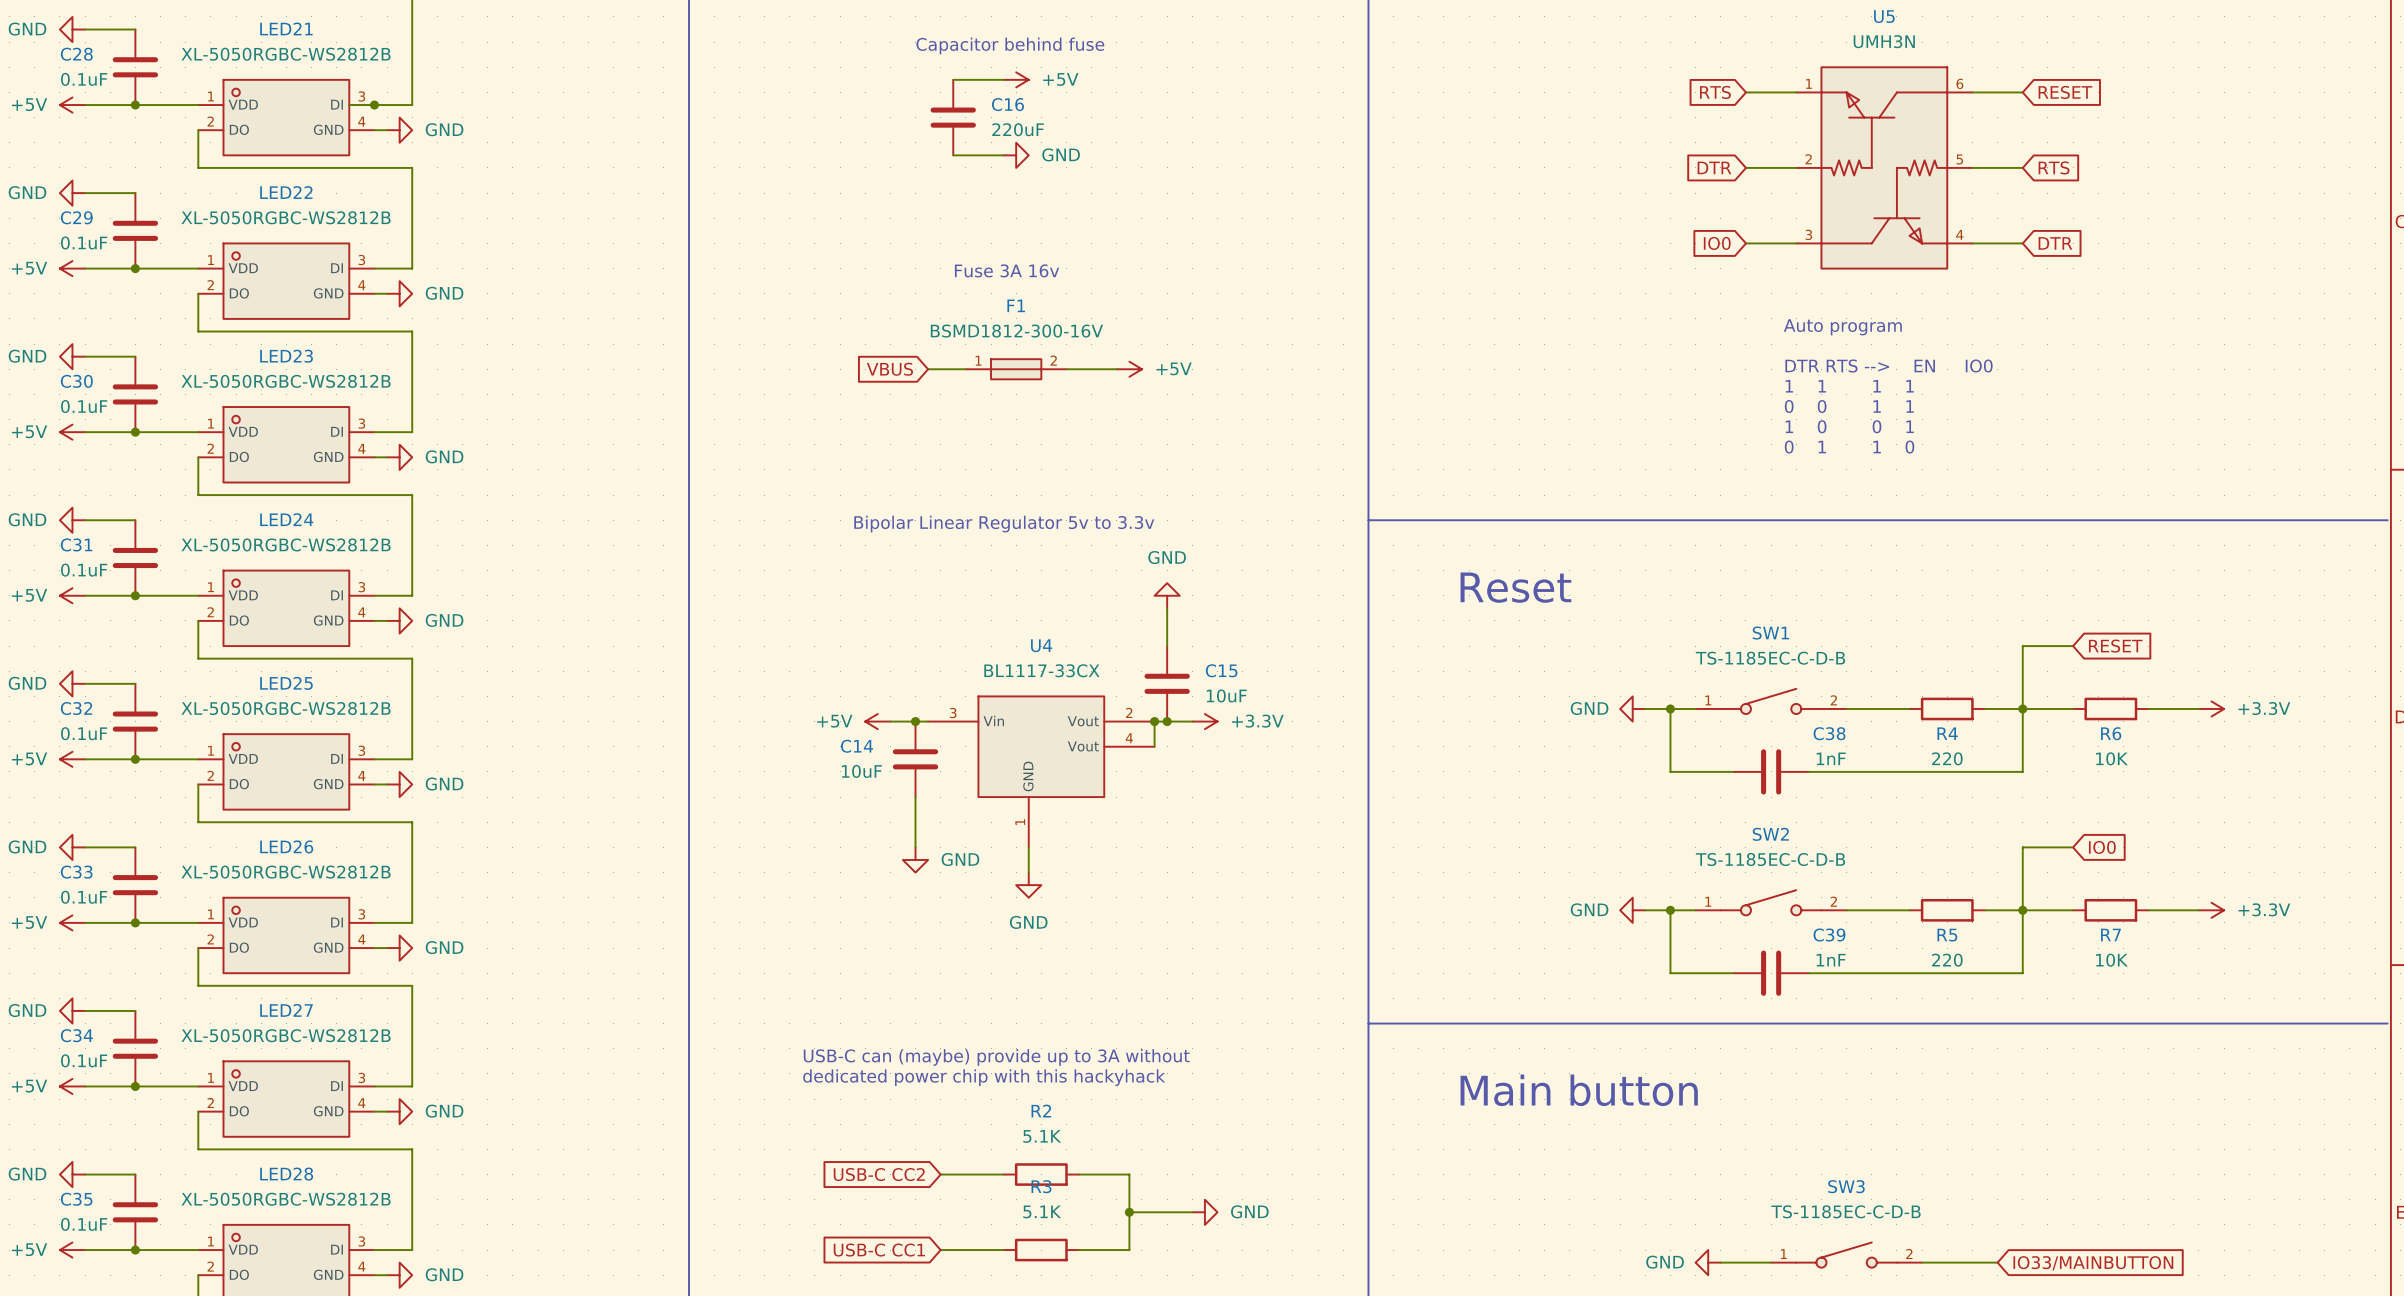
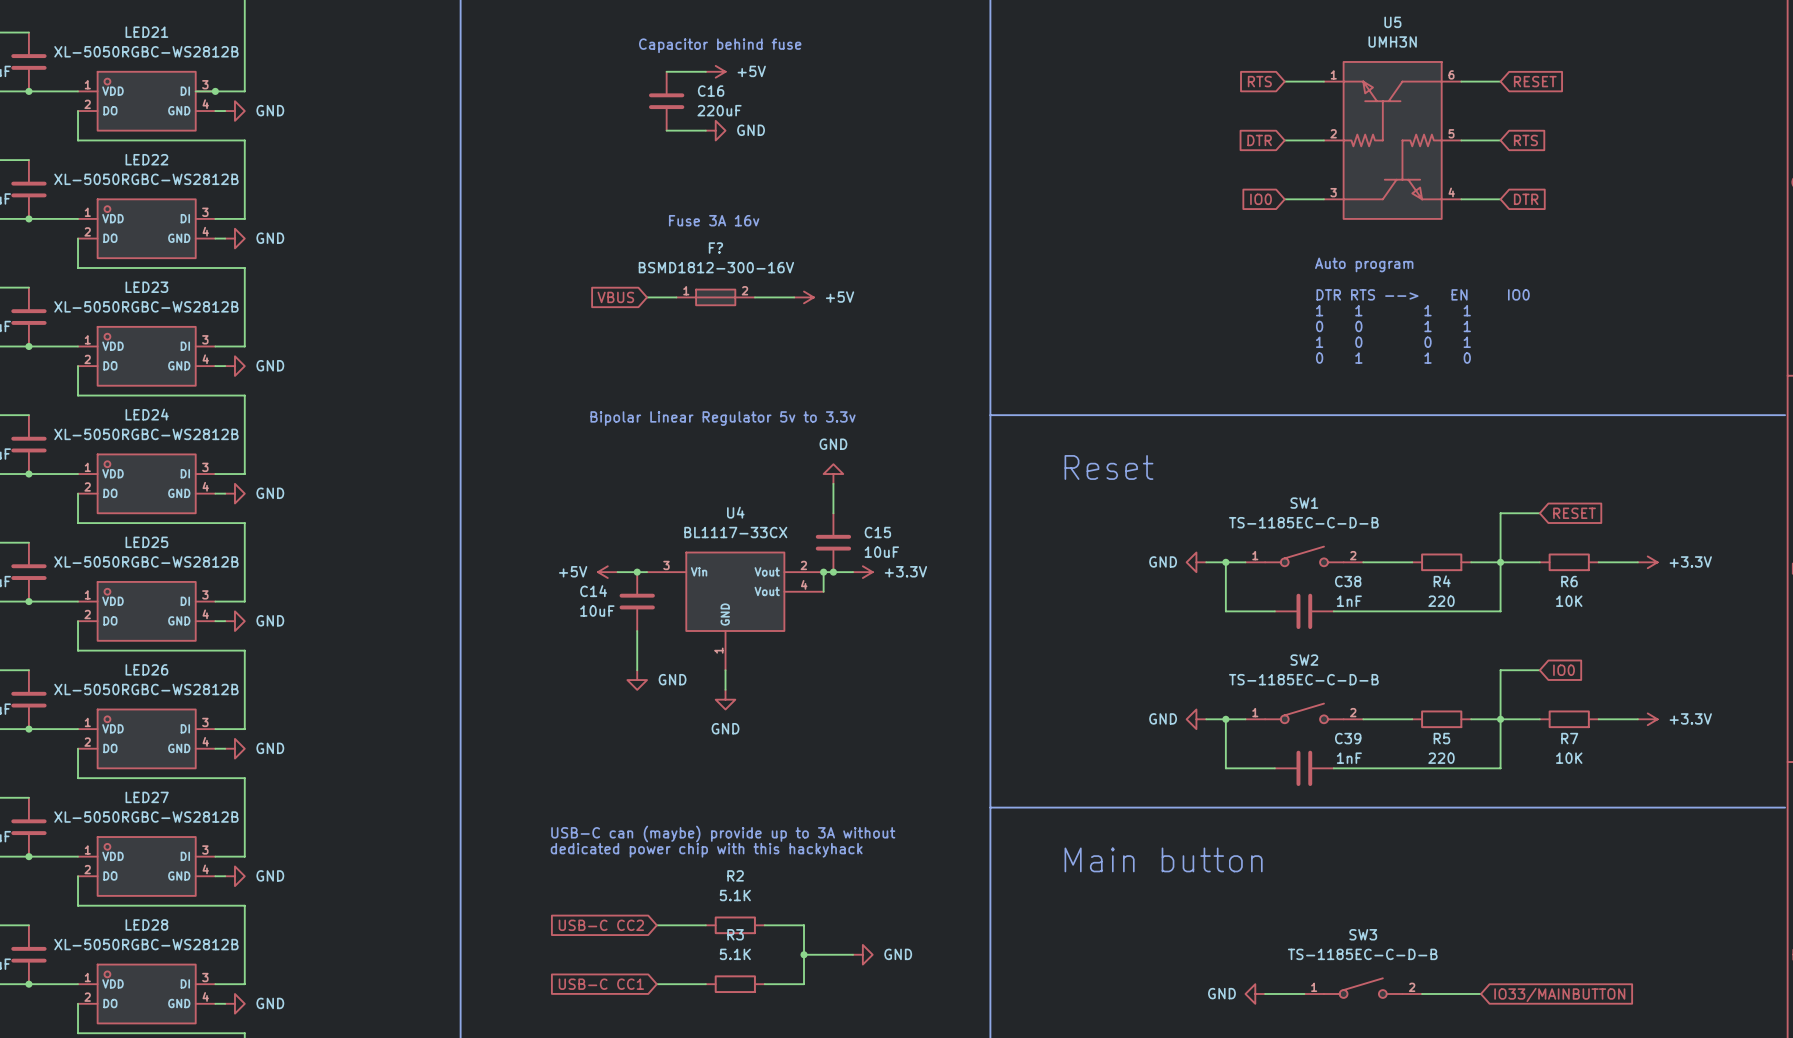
F1 name: F1 (1016, 305) -> F? (715, 248)

